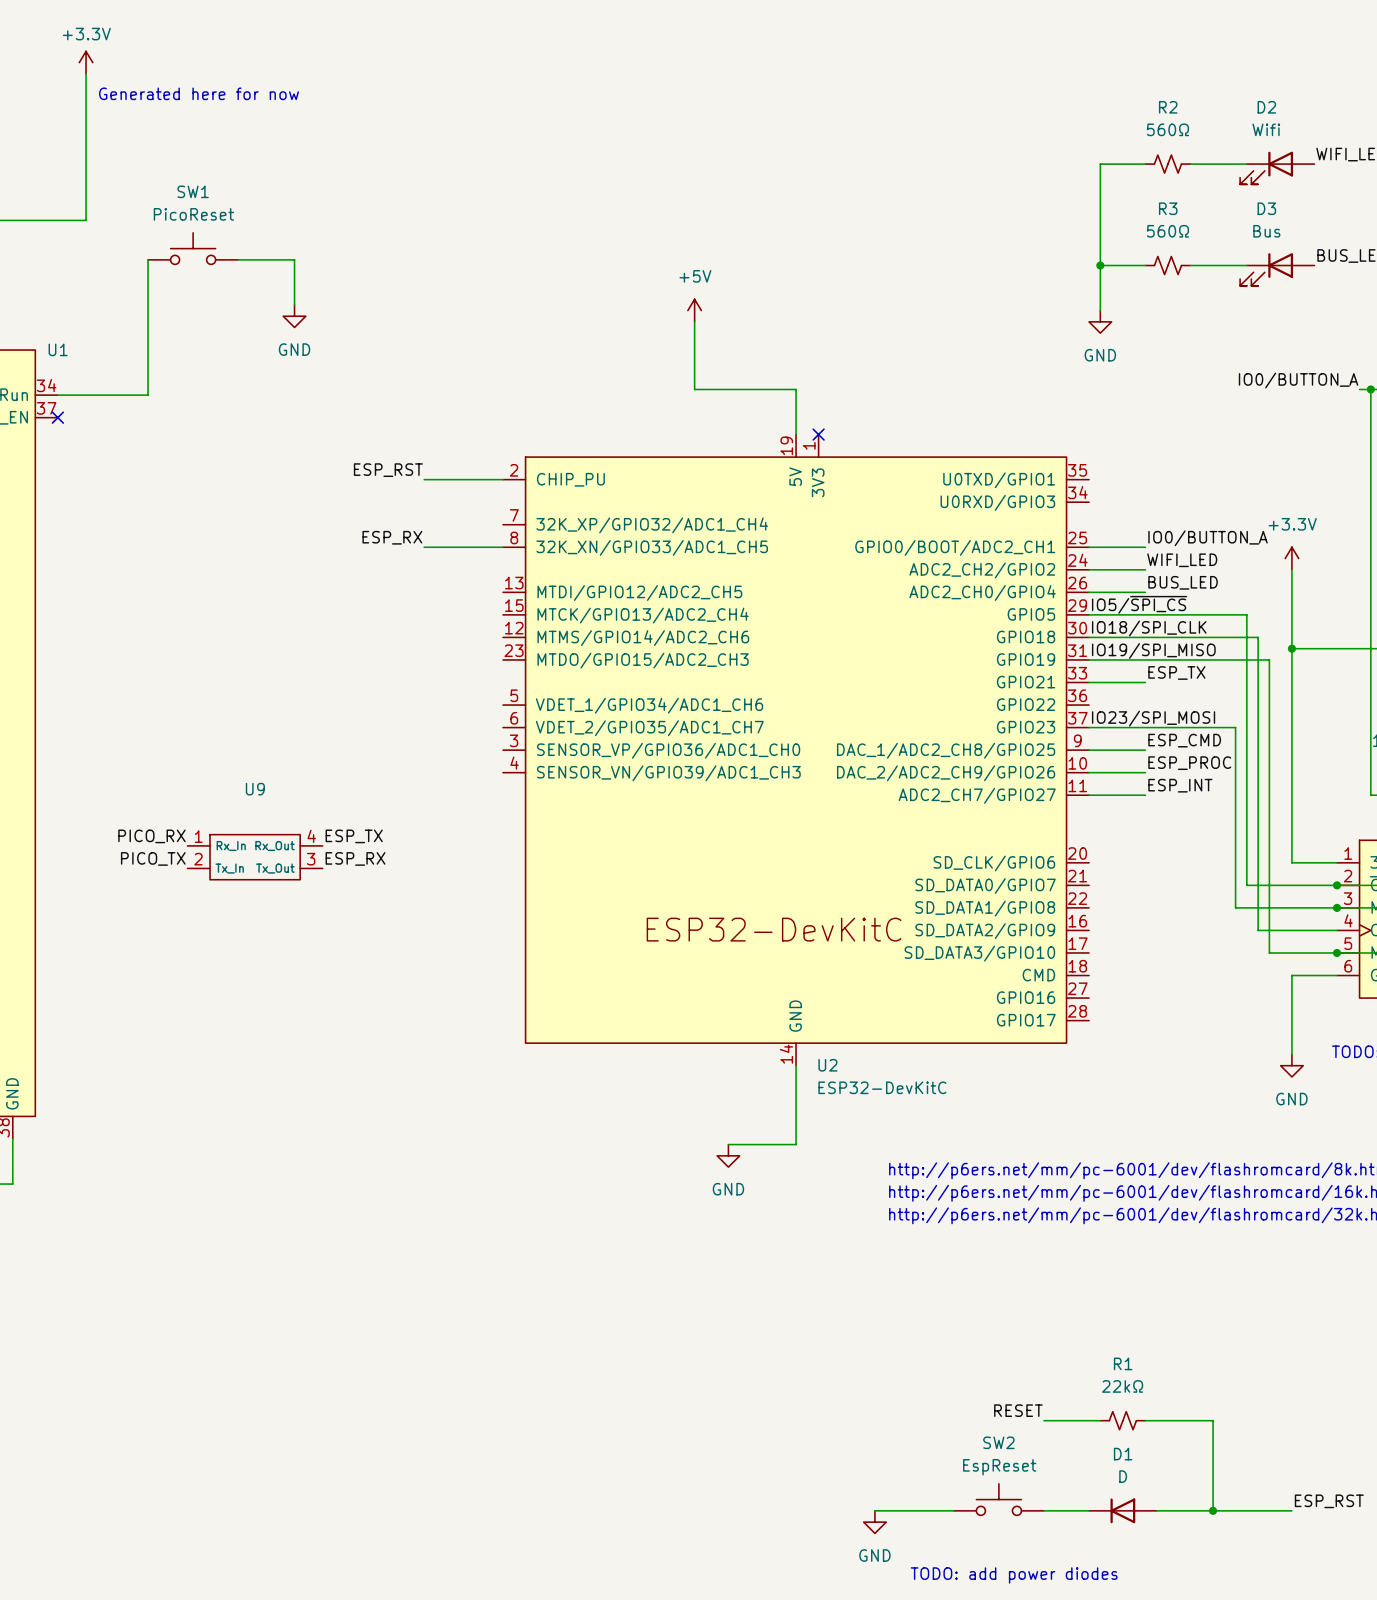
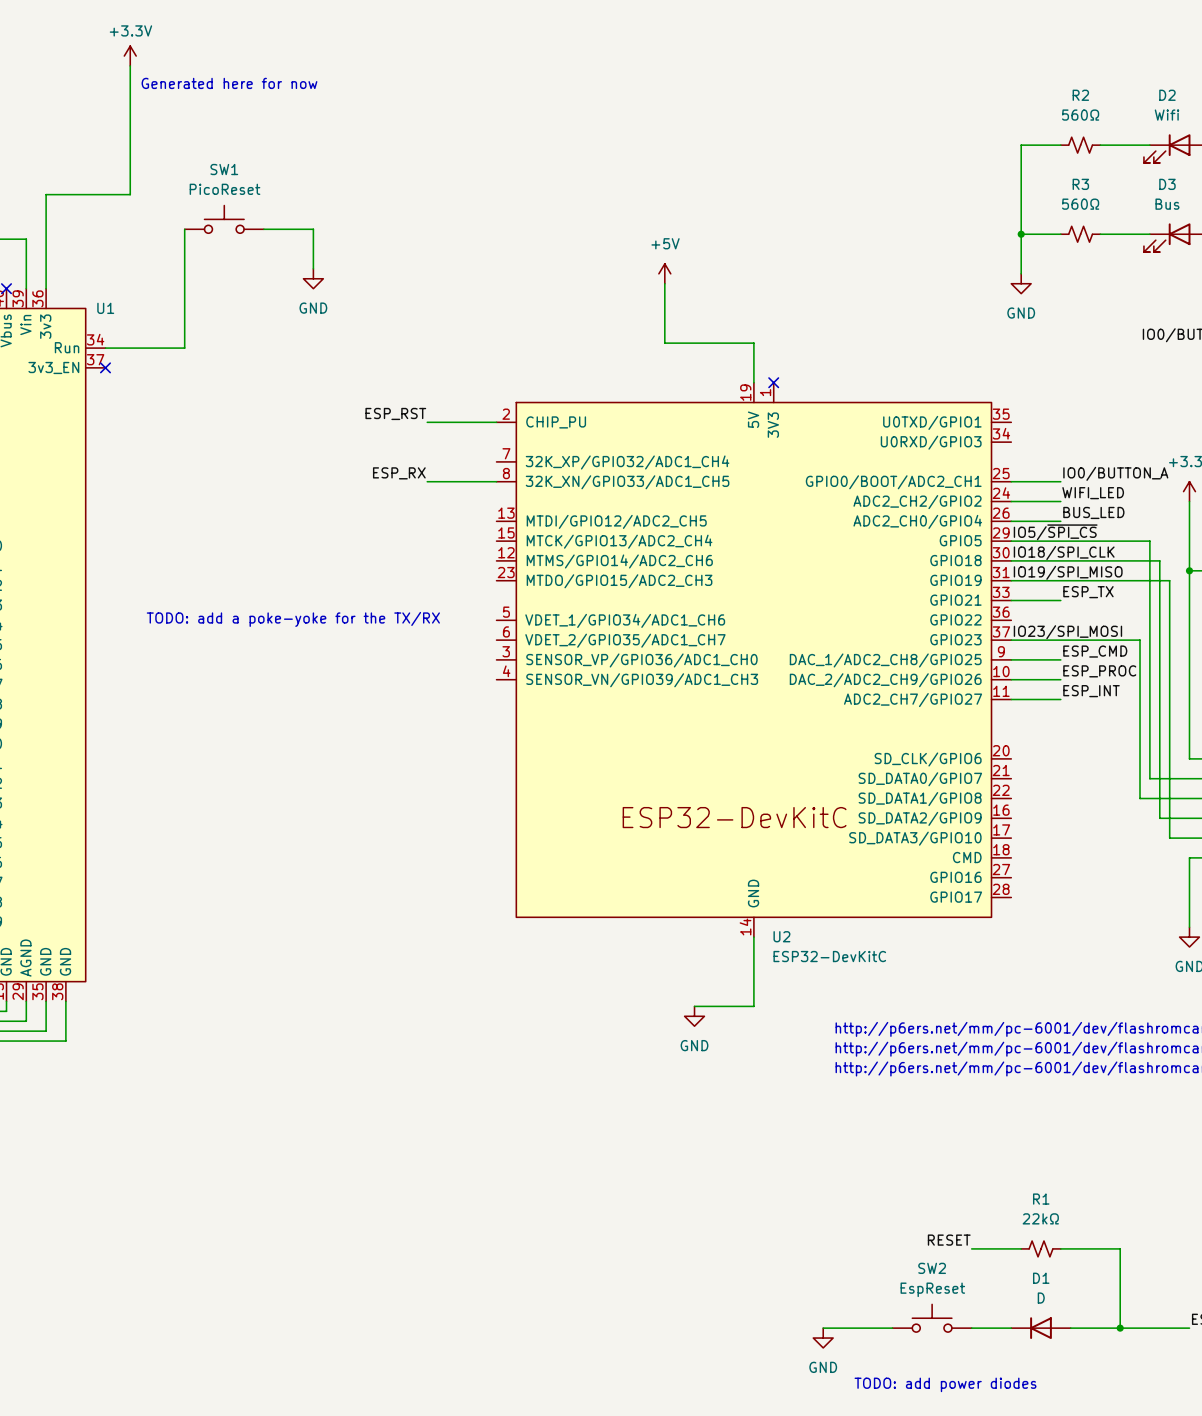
text: none -> TODO: add a poke-yoke for the TX/RX (293, 619)
label: PICO_RX (151, 836) -> none
label: ESP_TX (354, 836) -> none
U9: (255, 857) -> none
label: PICO_TX (153, 858) -> none
label: ESP_RX (355, 858) -> none

